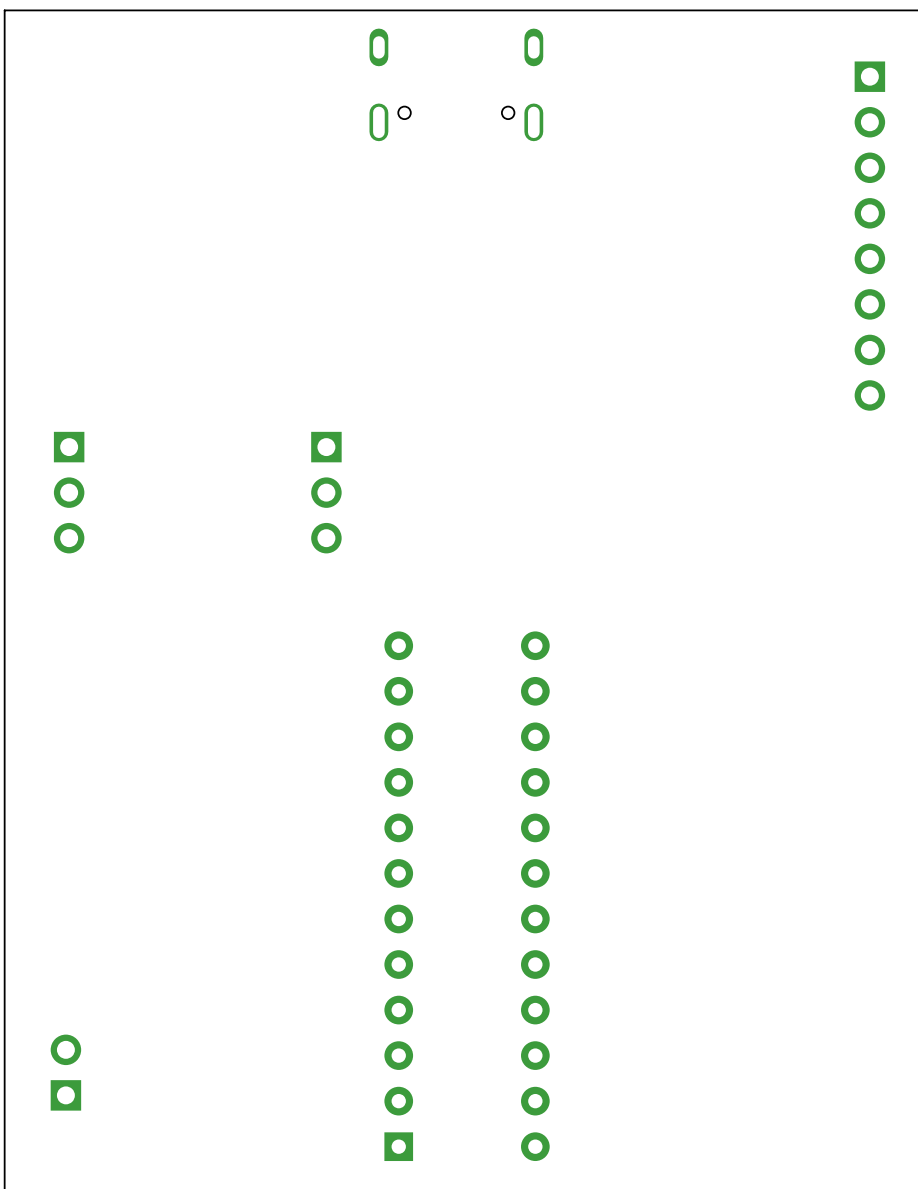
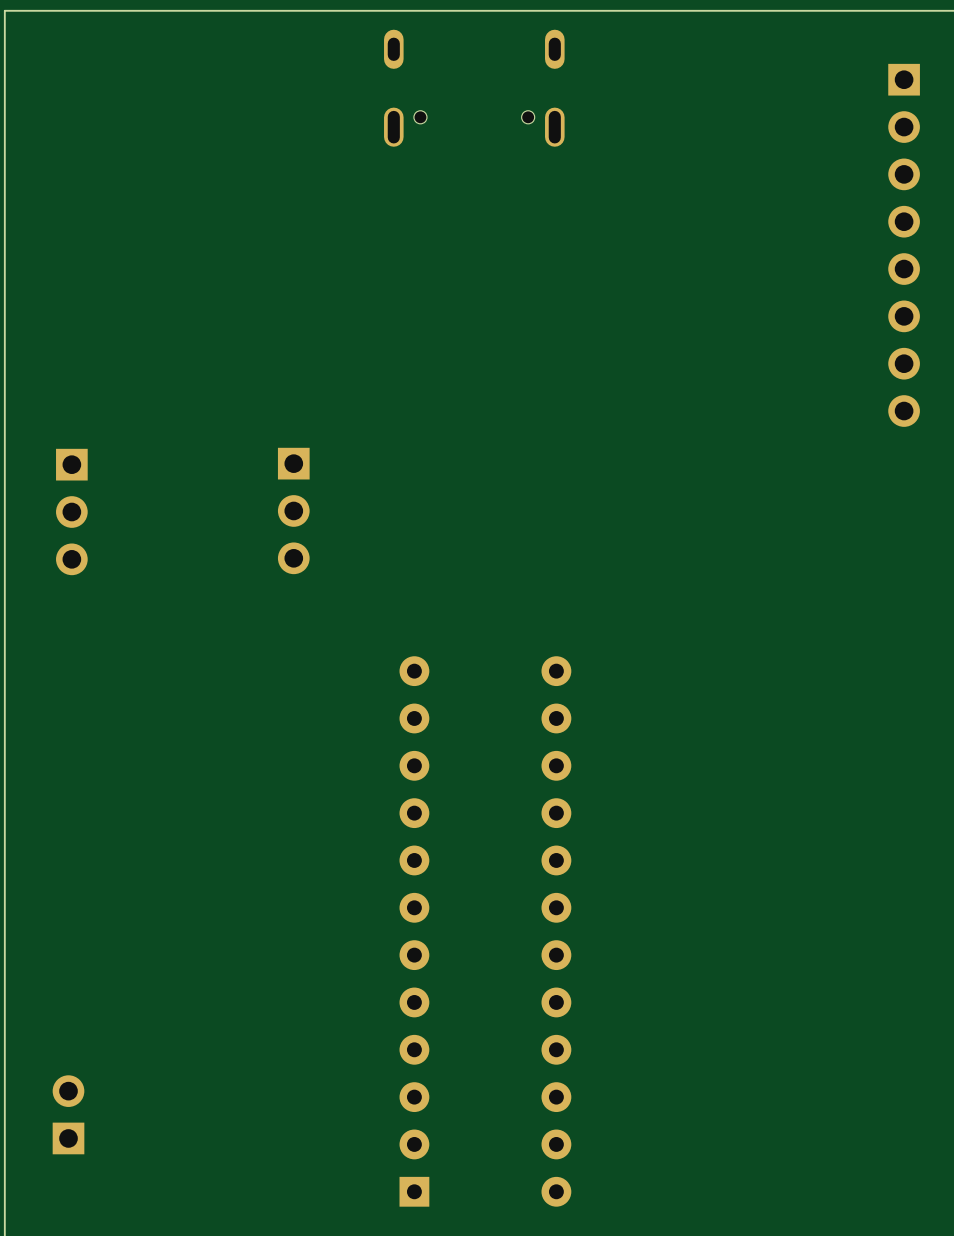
part position: (326, 492) -> (293, 510)

